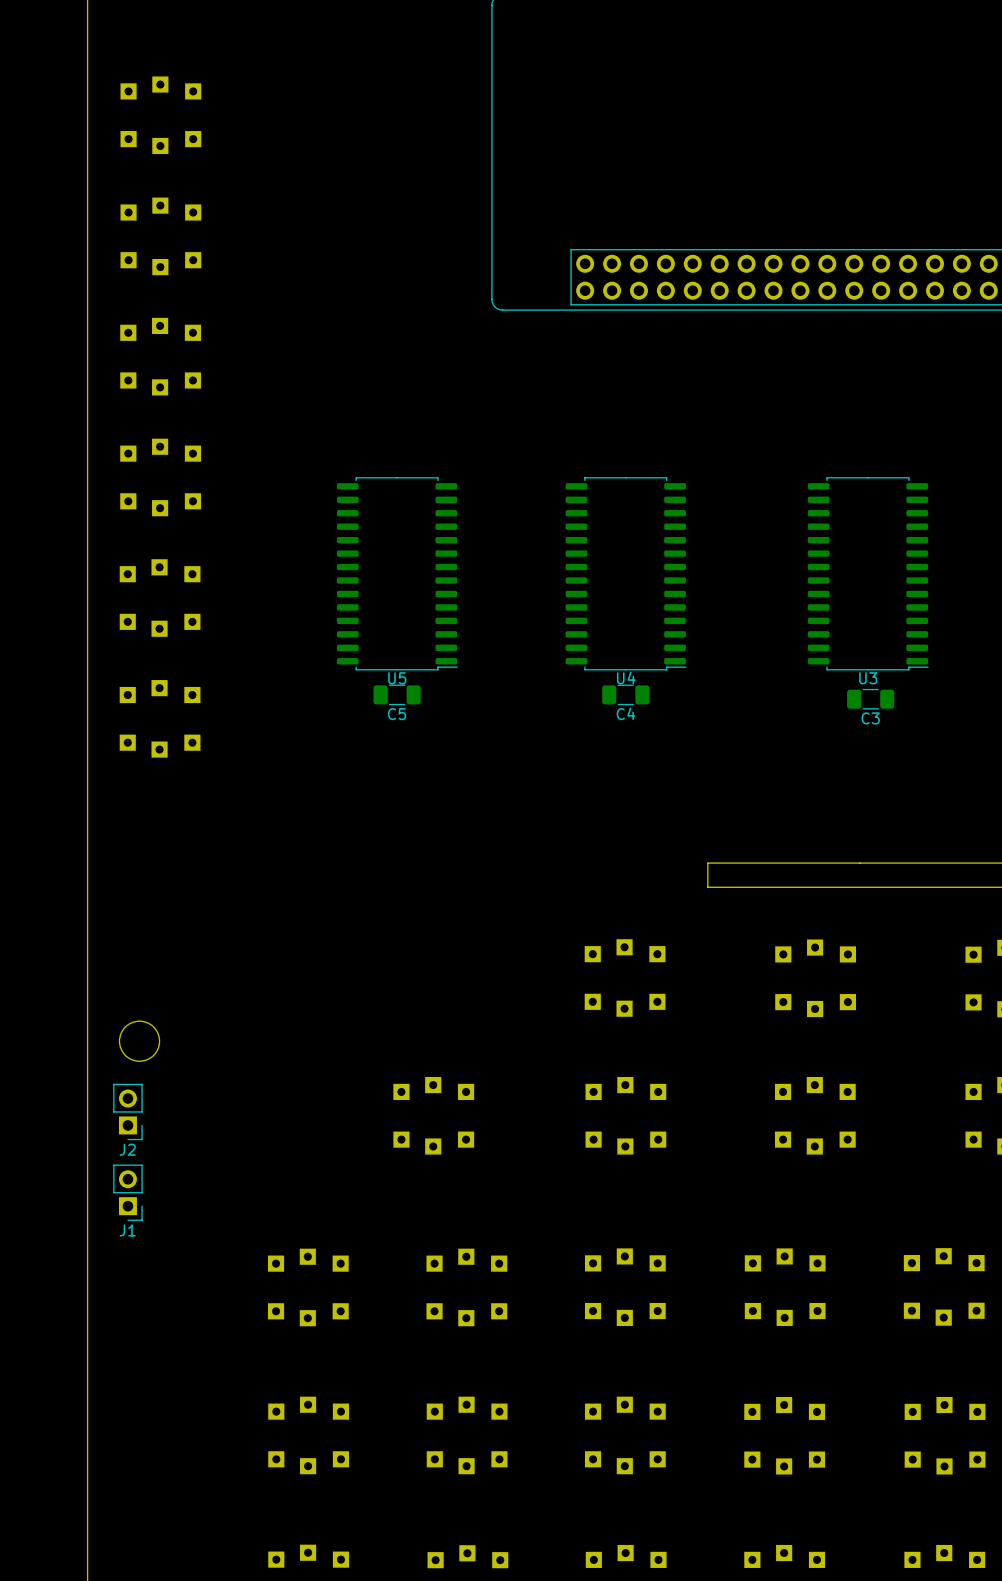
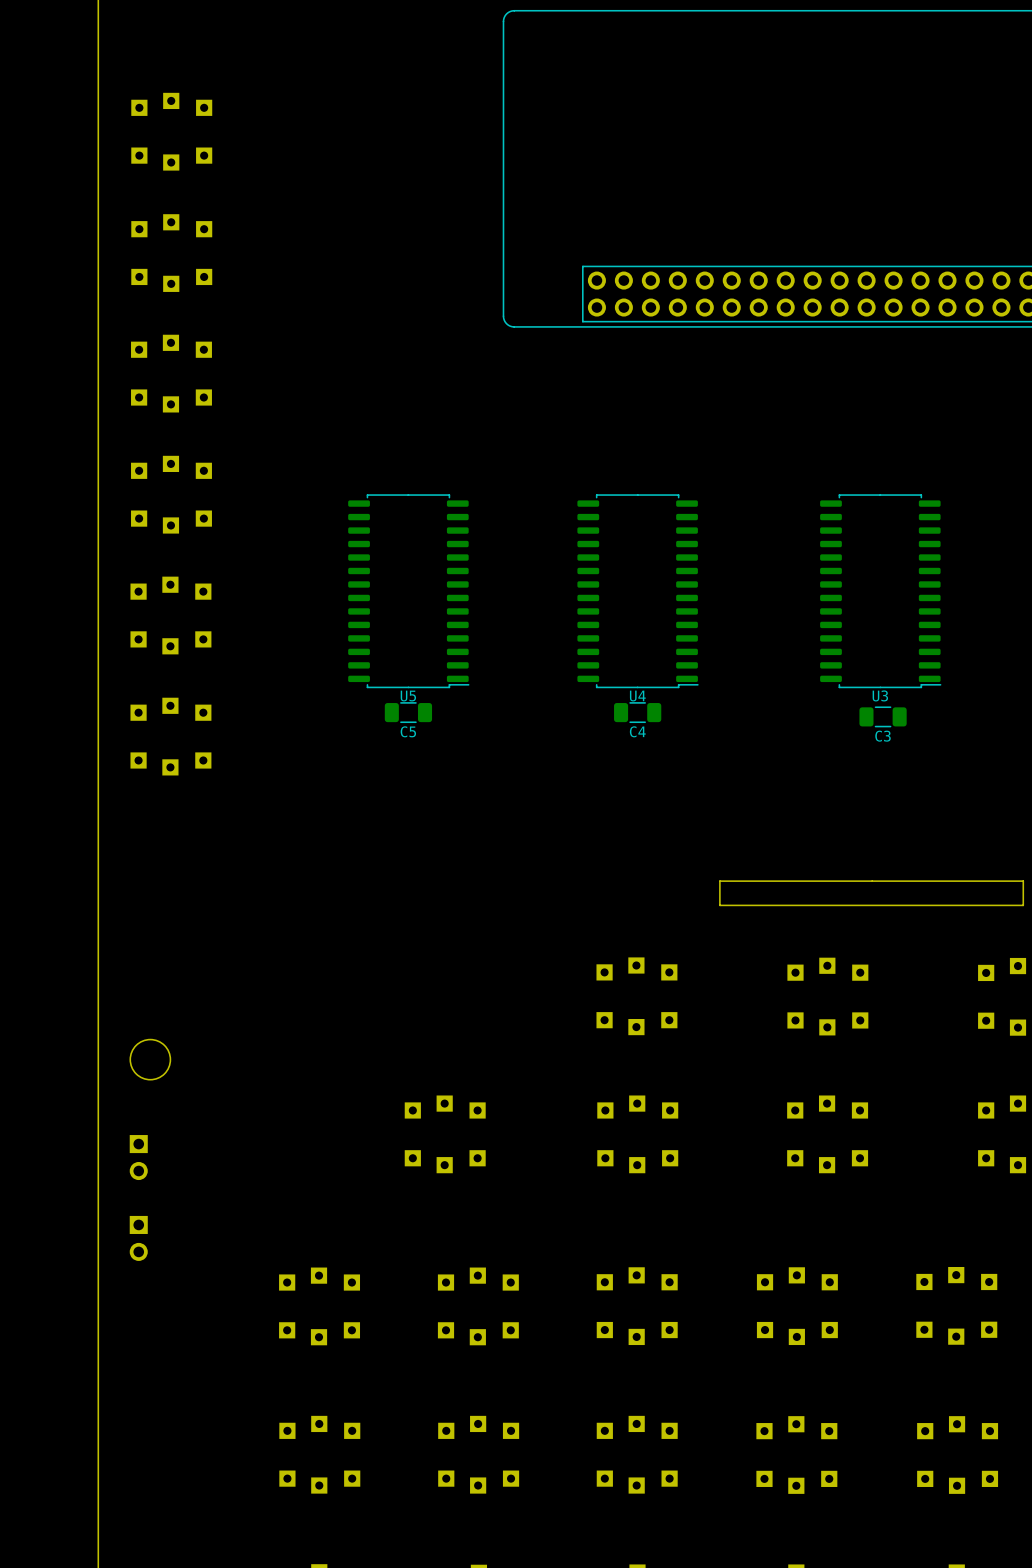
J2 side: bottom (127, 1111) -> top (138, 1157)
J1 side: bottom (127, 1192) -> top (138, 1238)

